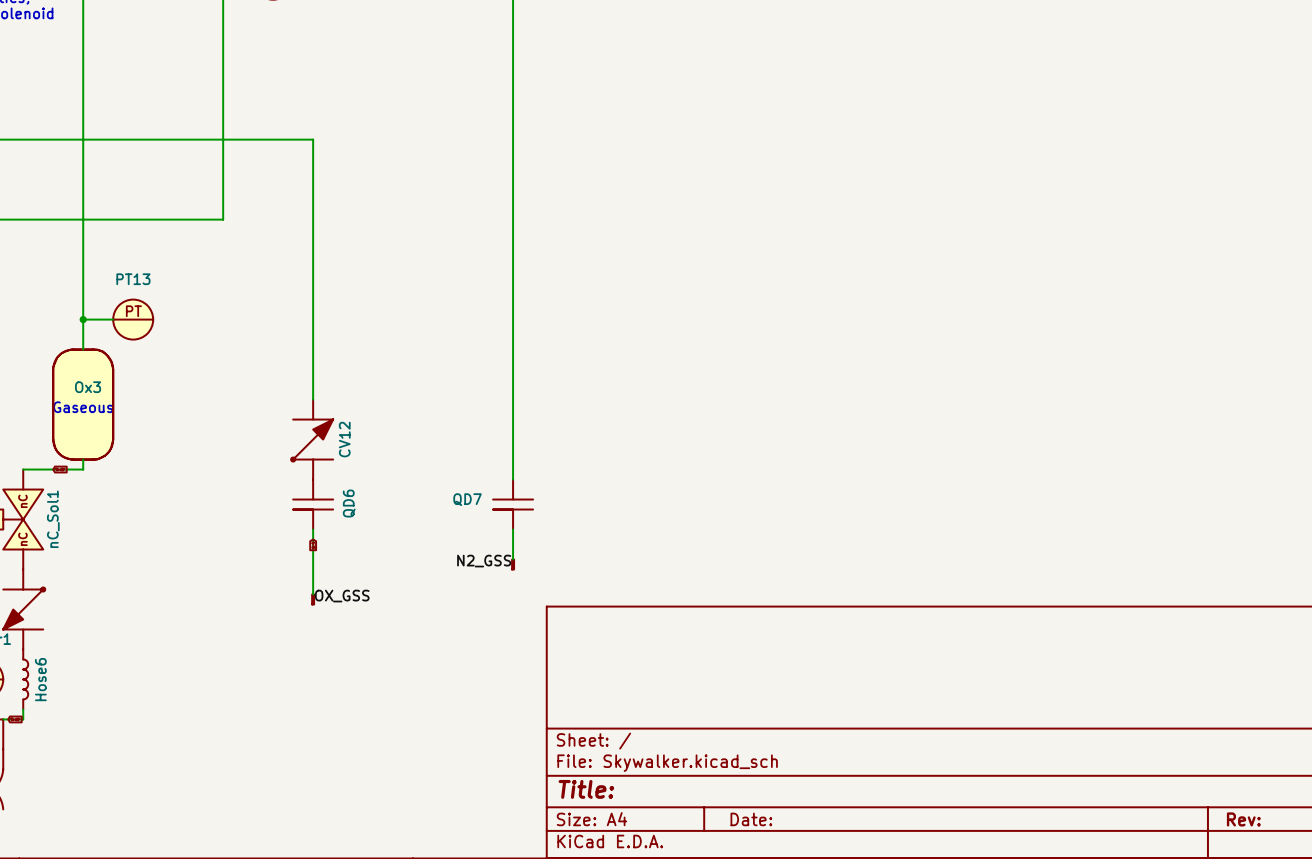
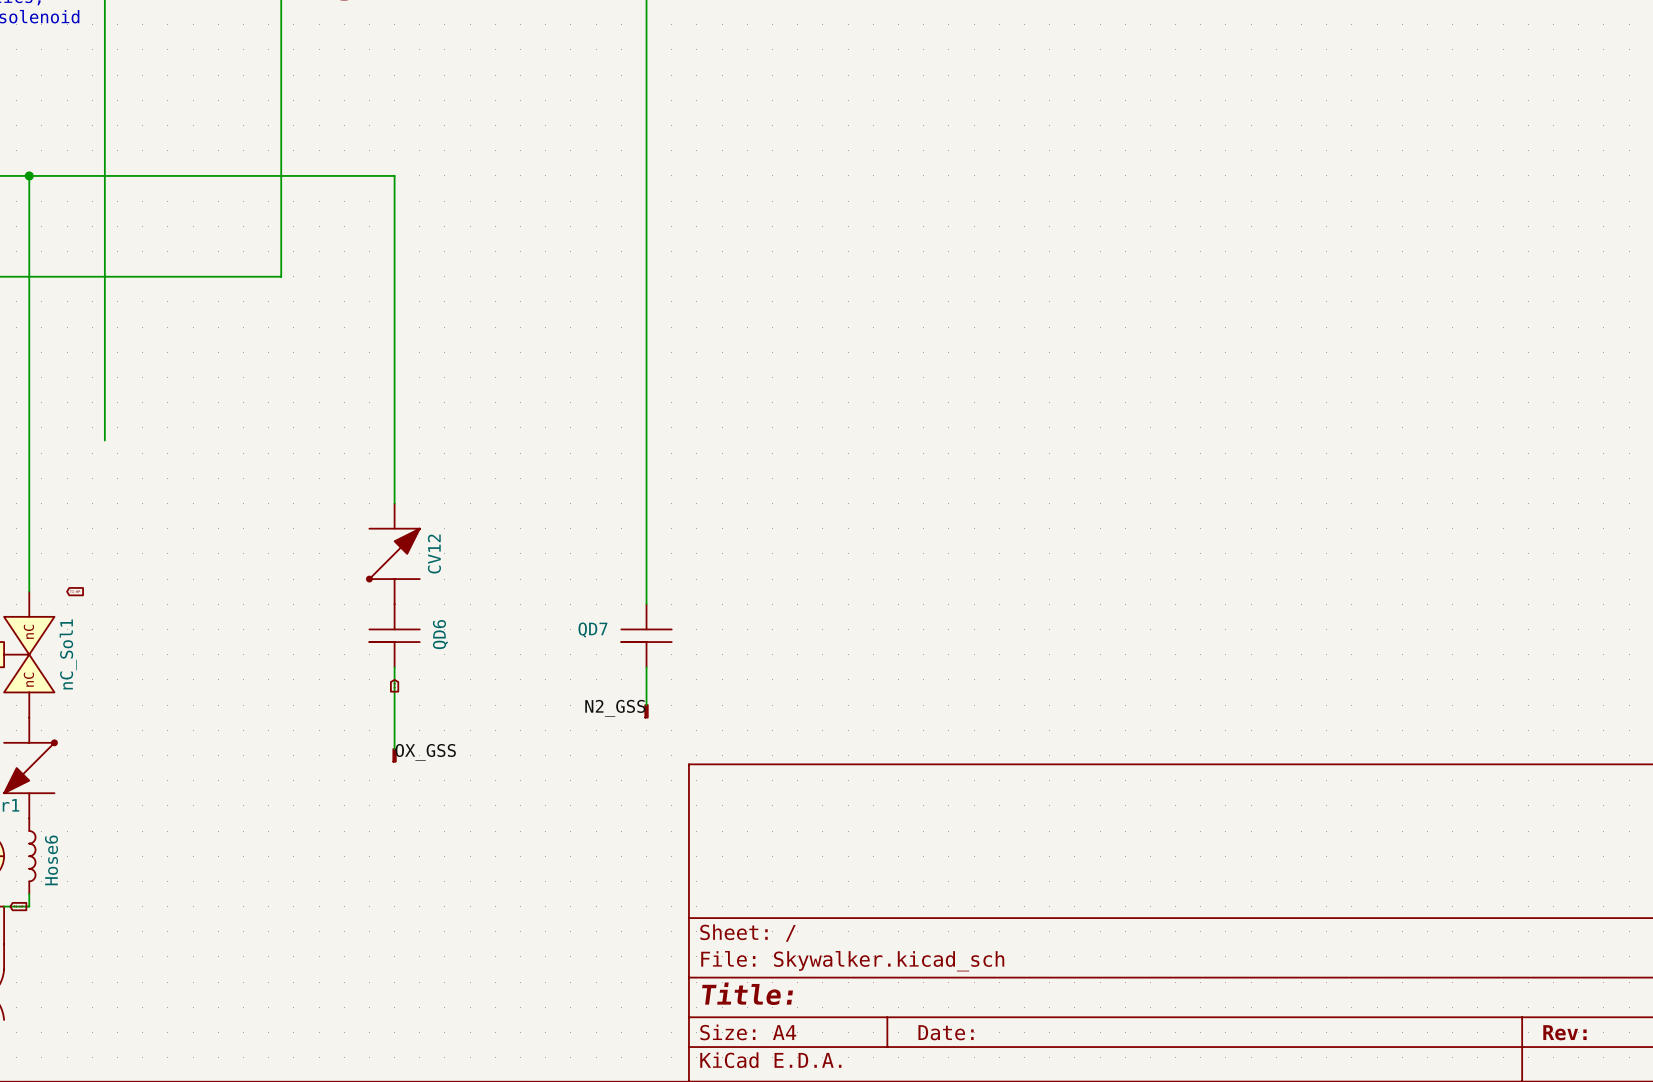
junction: none -> (29, 175)
wire: (83, 319) (113, 319) -> none
junction: (83, 319) -> none
PT13: (133, 319) -> none
Ox3: (83, 404) -> none
text: Gaseous (83, 407) -> none
wire: (83, 459) (83, 469) (23, 469) -> (29, 175) (29, 591)

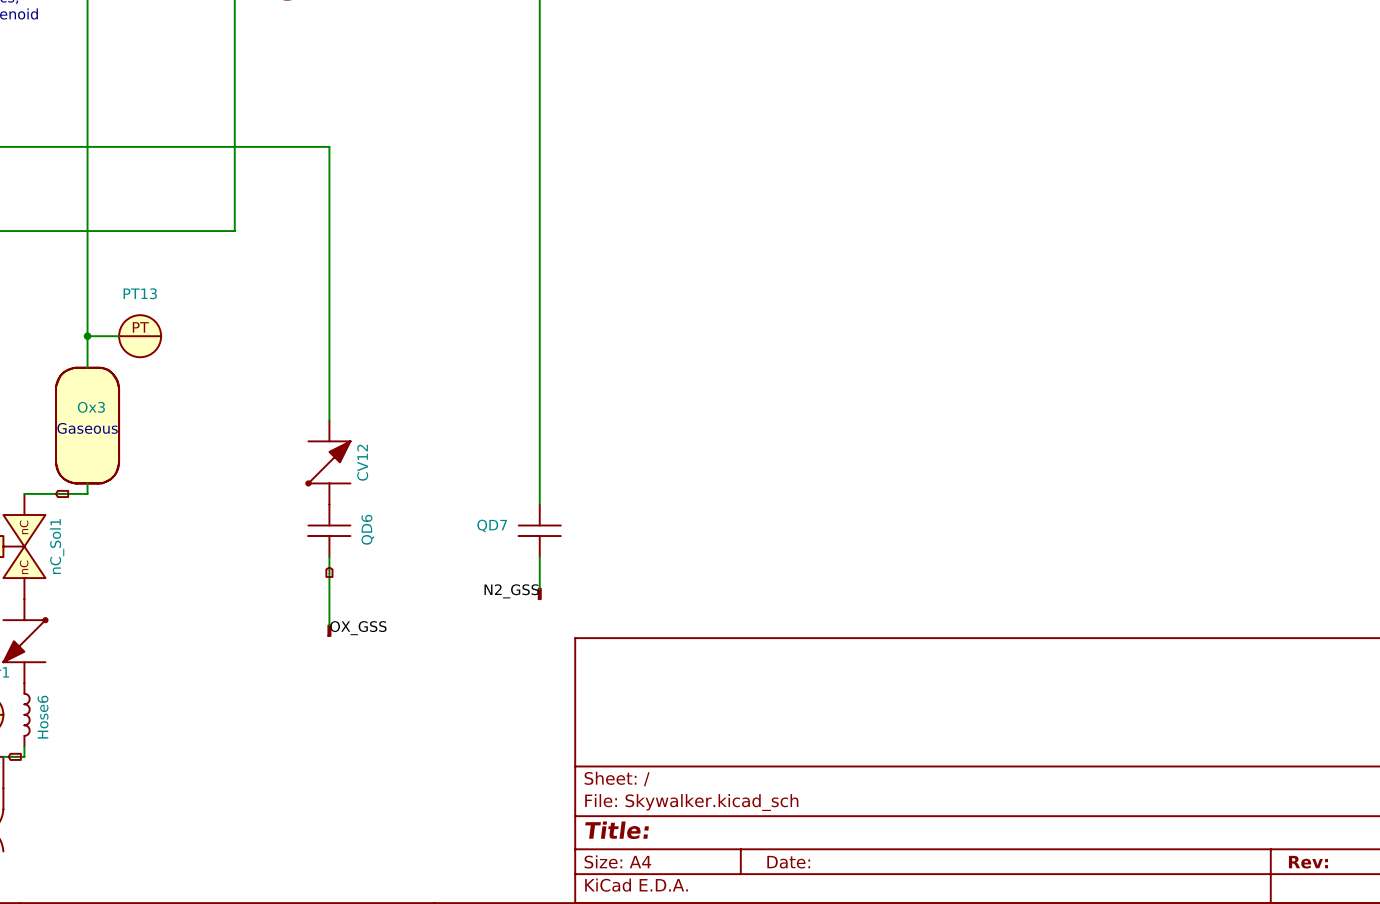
wire: (29, 175) (29, 591) -> (87, 483) (87, 493) (24, 493)
junction: (29, 175) -> none
wire: none -> (87, 336) (119, 336)
junction: none -> (87, 336)
PT13: none -> (140, 336)
Ox3: none -> (87, 425)
text: none -> Gaseous (87, 428)

